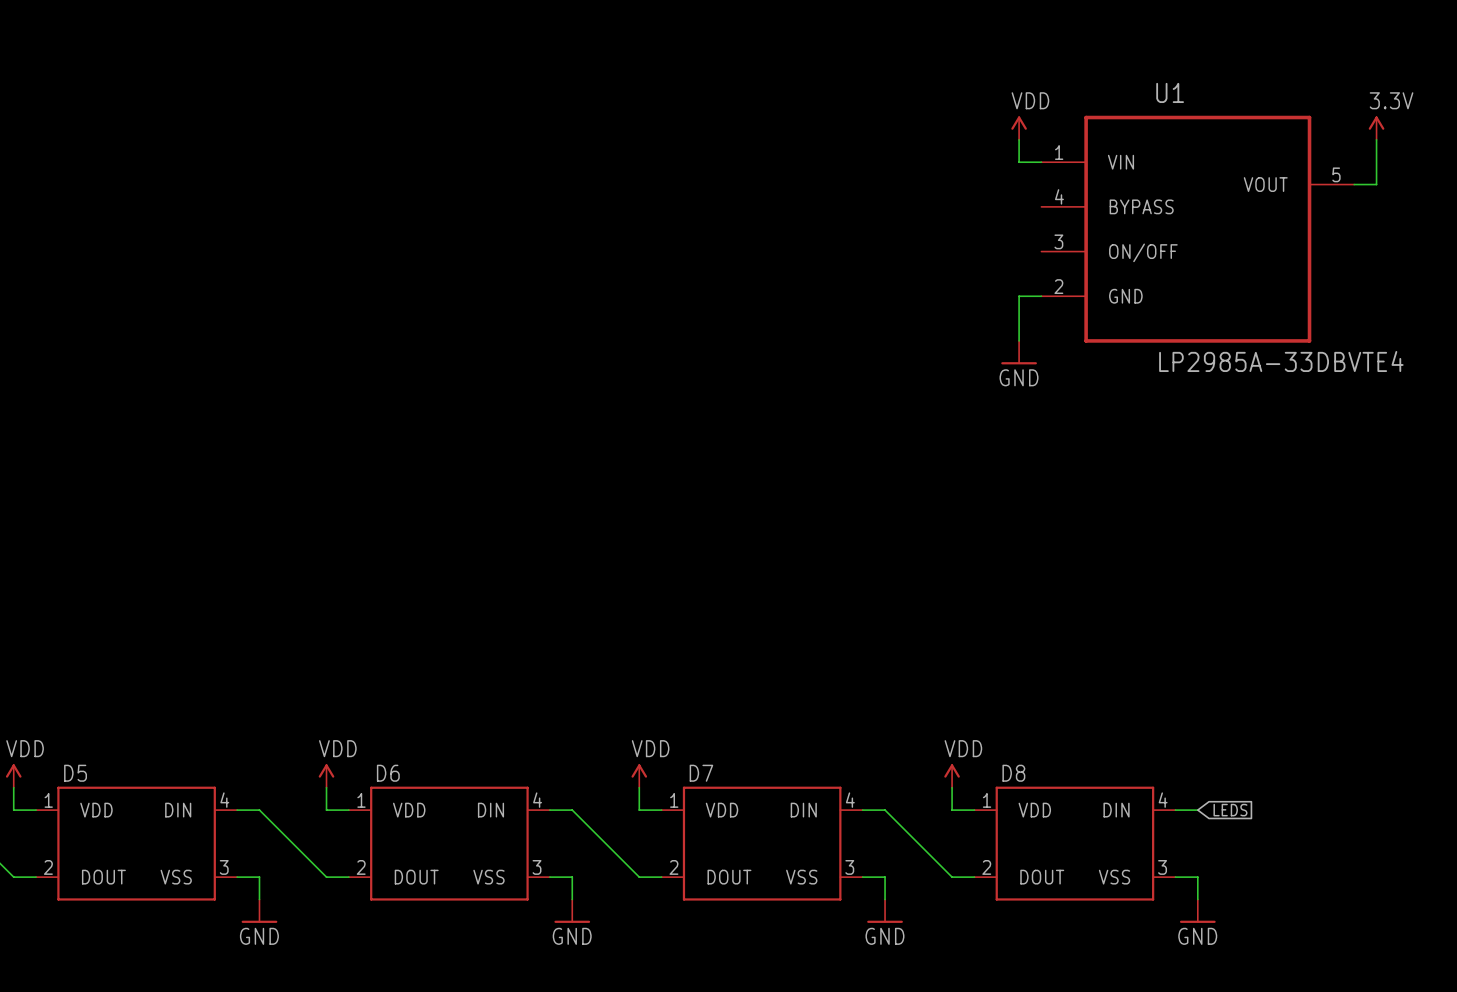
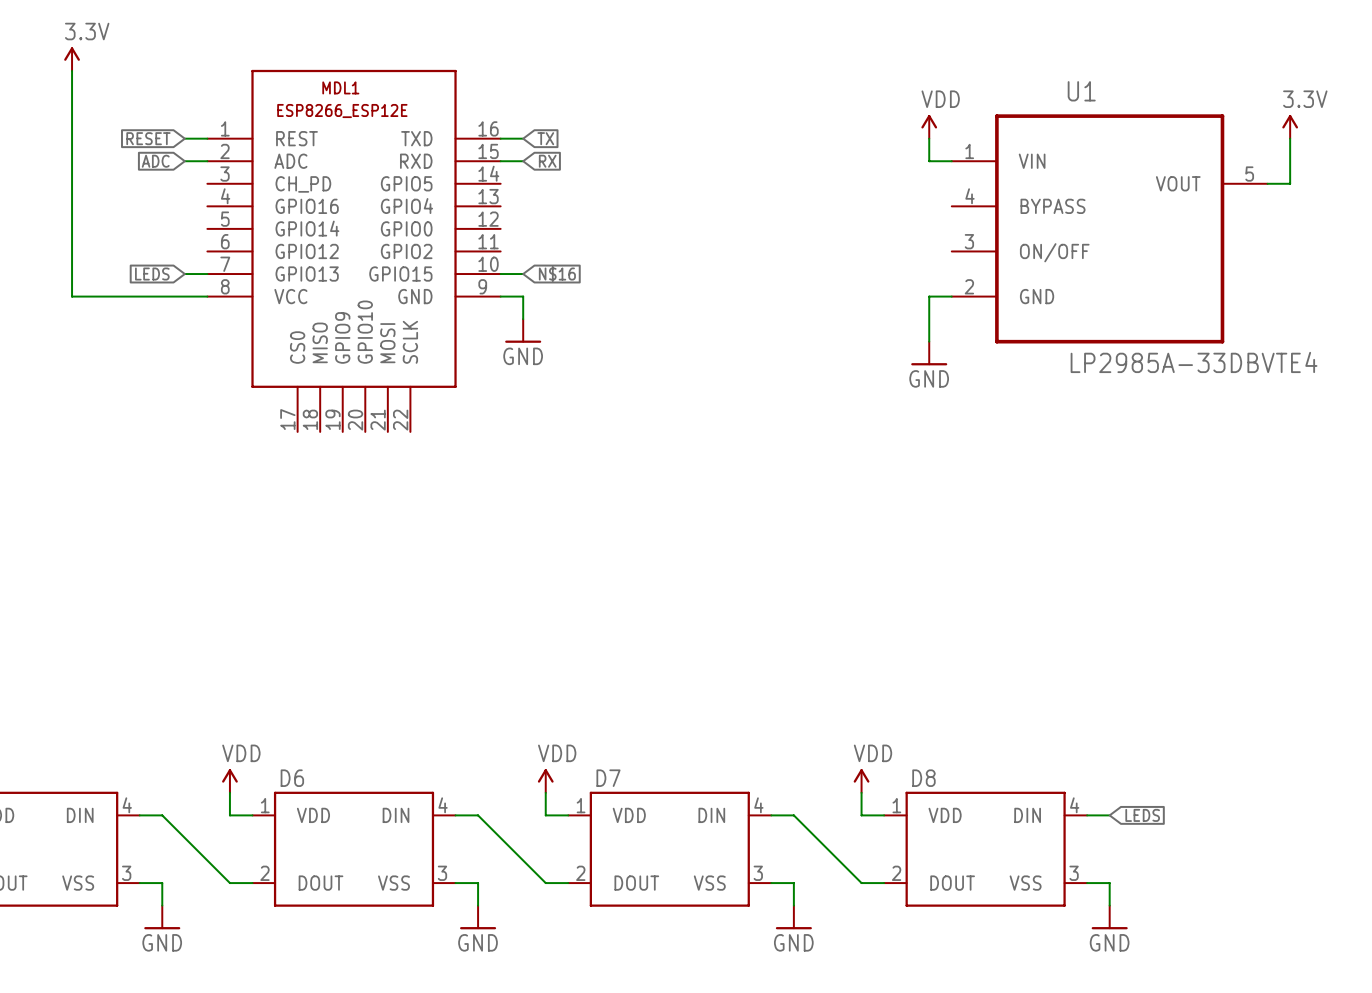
power symbol: none -> 3.3V (72, 59)
wire: none -> (72, 71) (72, 296) (207, 296)
global label: none -> RESET (148, 138)
wire: none -> (184, 138) (207, 138)
wire: none -> (500, 138) (523, 138)
global label: none -> TX (545, 138)
global label: none -> ADC (155, 161)
wire: none -> (184, 161) (207, 161)
wire: none -> (500, 161) (523, 161)
global label: none -> RX (547, 161)
MDL1: none -> (354, 250)
global label: none -> LEDS (152, 274)
wire: none -> (184, 274) (207, 274)
wire: none -> (500, 274) (523, 274)
global label: none -> N$16 (557, 274)
wire: none -> (500, 296) (523, 296) (523, 319)
power symbol: none -> GND (523, 330)

